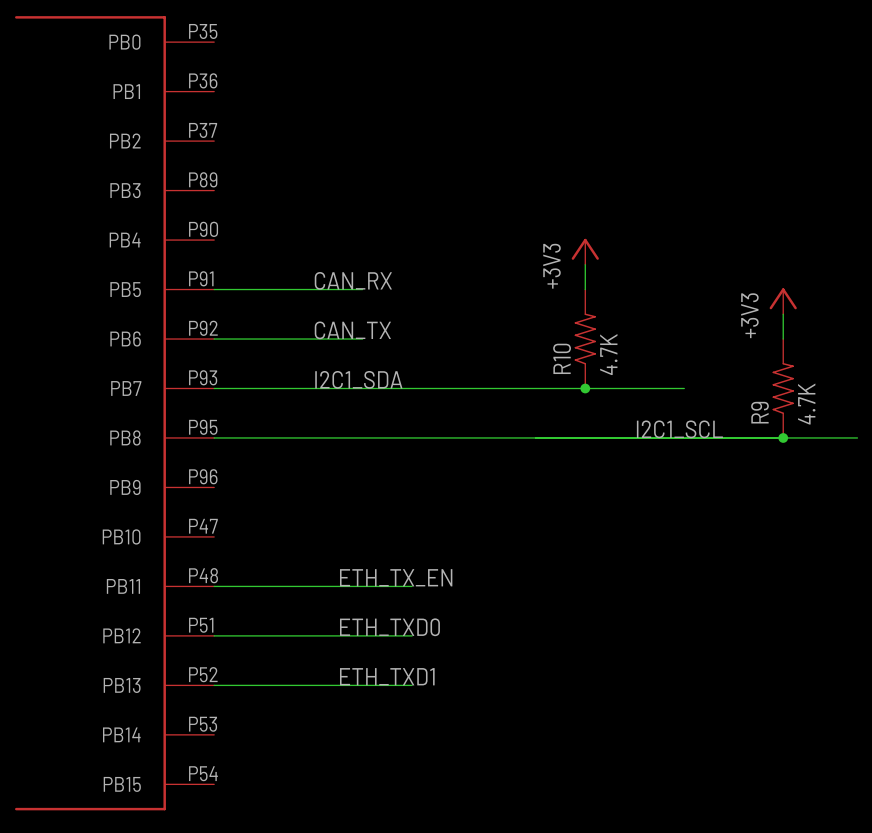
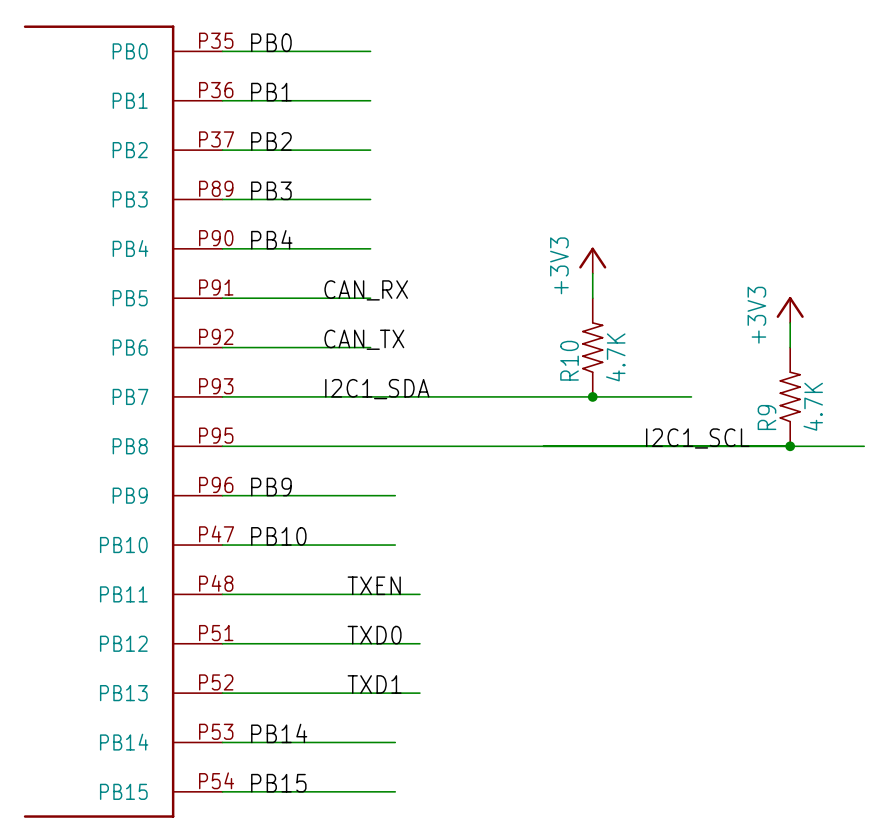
label: none -> PB0 (271, 42)
wire: none -> (222, 51) (370, 51)
label: none -> PB1 (271, 92)
wire: none -> (222, 100) (370, 100)
label: none -> PB2 (271, 141)
wire: none -> (222, 150) (370, 150)
label: none -> PB3 (271, 190)
wire: none -> (222, 199) (370, 199)
label: none -> PB4 (271, 239)
wire: none -> (222, 248) (370, 248)
label: none -> PB9 (271, 487)
wire: none -> (222, 495) (395, 495)
label: none -> PB10 (278, 536)
wire: none -> (222, 545) (395, 545)
label: ETH_TX_EN (396, 577) -> TXEN (374, 585)
label: ETH_TXD0 (389, 627) -> TXD0 (374, 635)
label: ETH_TXD1 (387, 676) -> TXD1 (374, 684)
label: none -> PB14 (279, 733)
wire: none -> (222, 742) (395, 742)
label: none -> PB15 (278, 783)
wire: none -> (222, 791) (395, 791)

